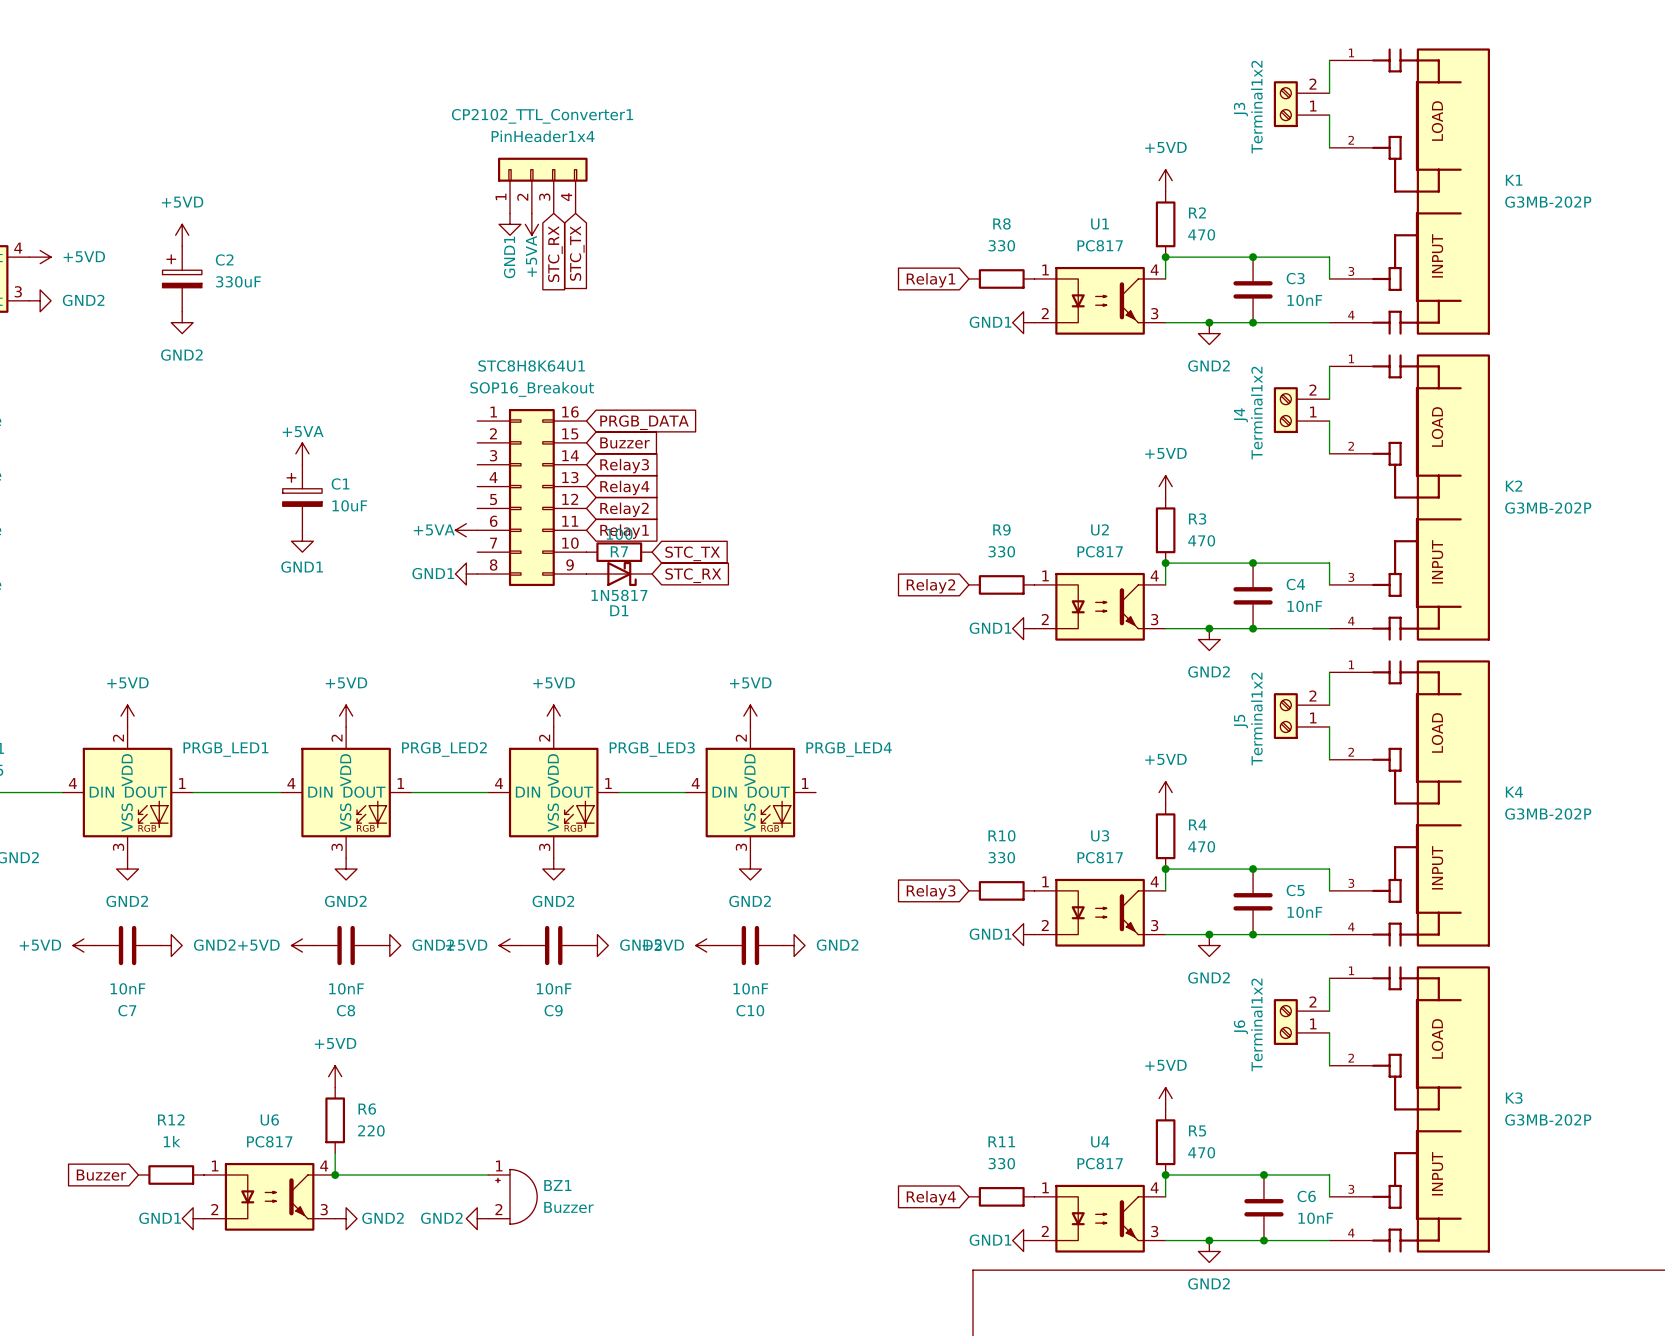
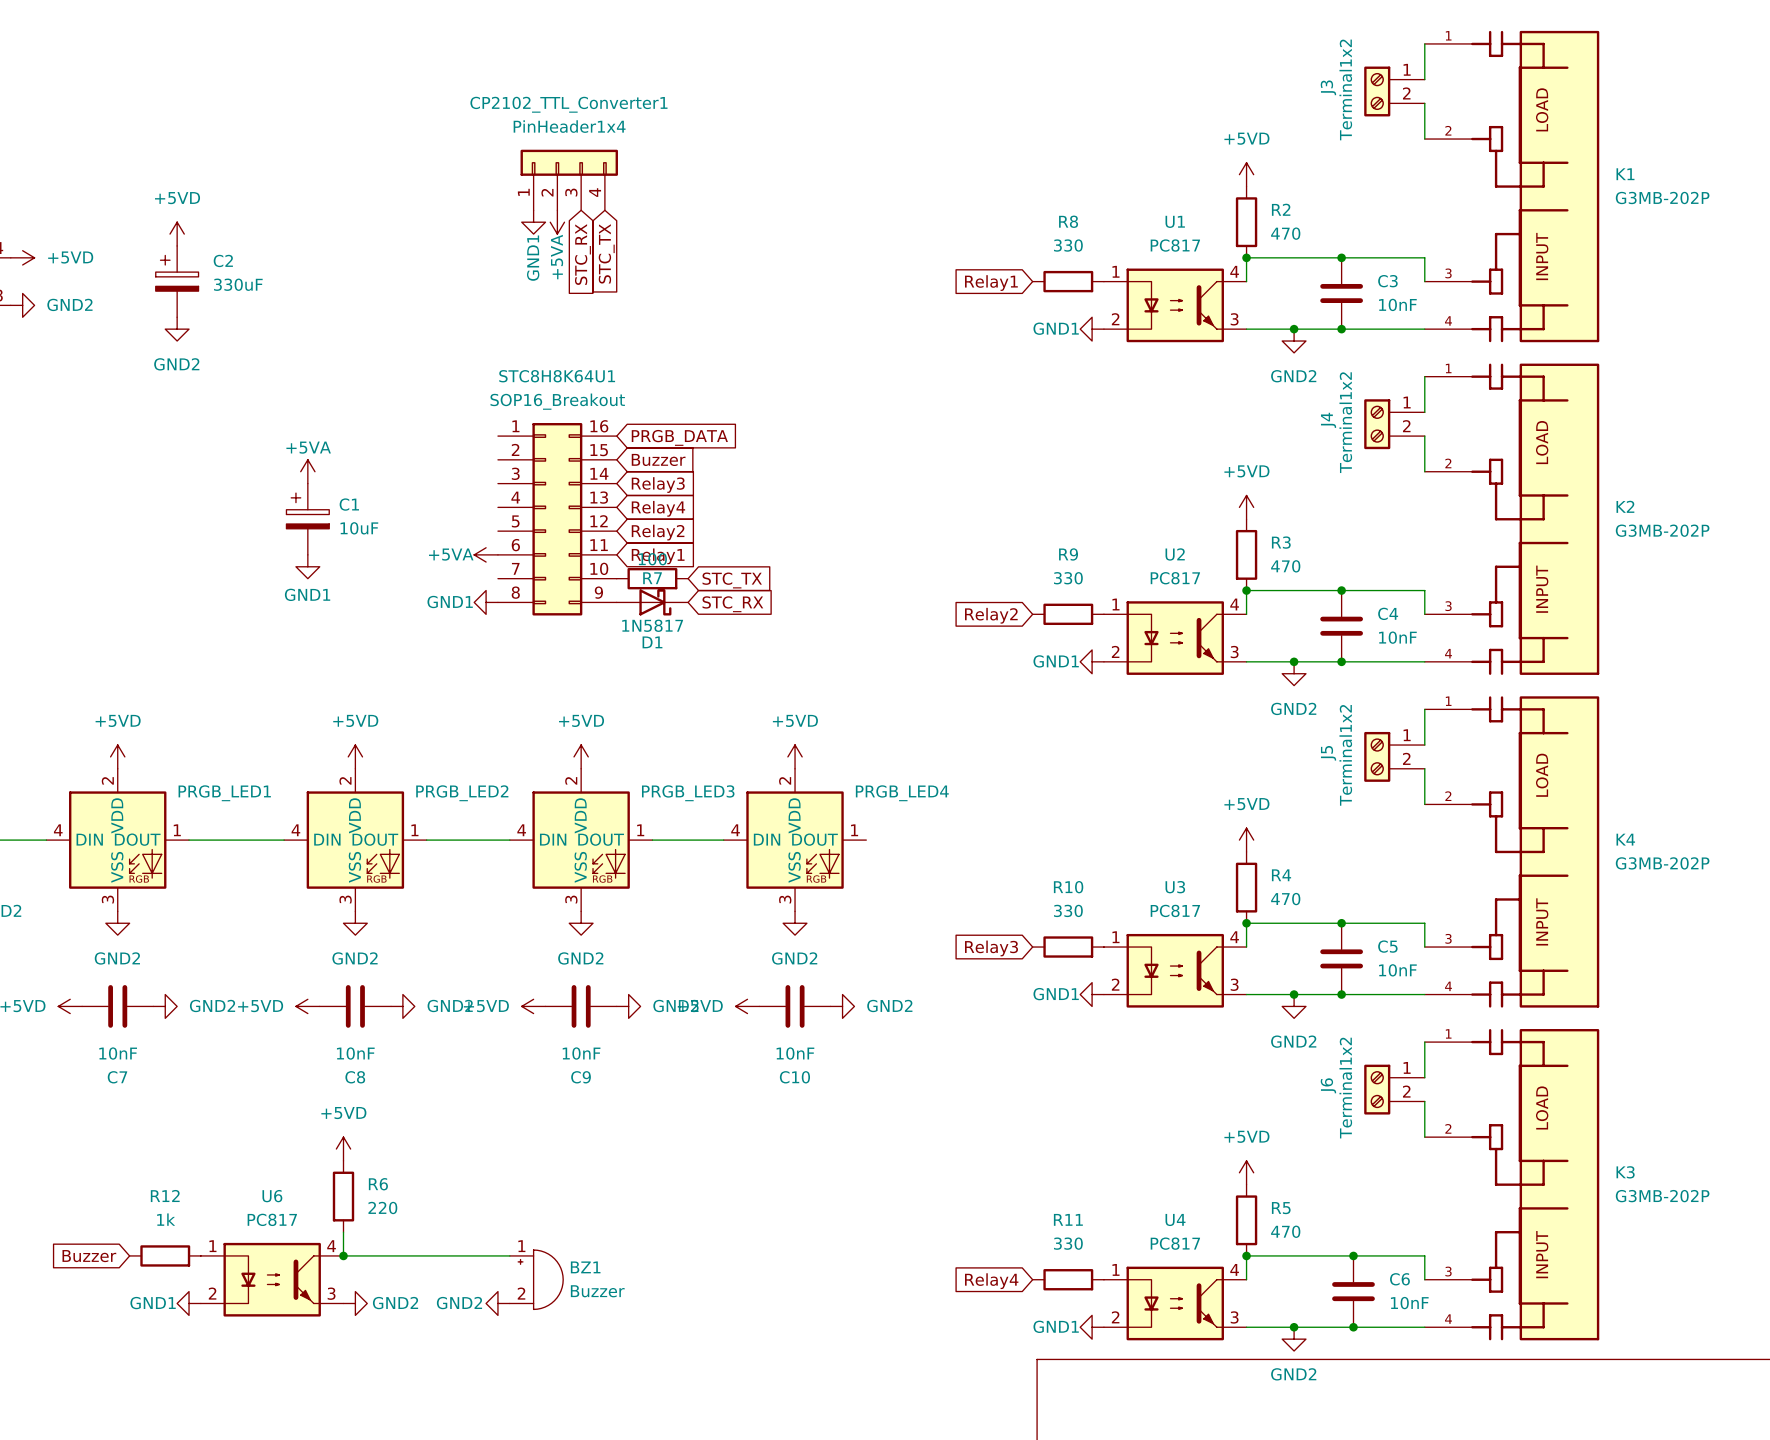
J3 flip: as is (1285, 104) -> up-down (1377, 91)
J4 flip: as is (1285, 410) -> up-down (1377, 424)
J5 flip: as is (1285, 716) -> up-down (1377, 756)
J6 flip: as is (1285, 1022) -> up-down (1377, 1089)

